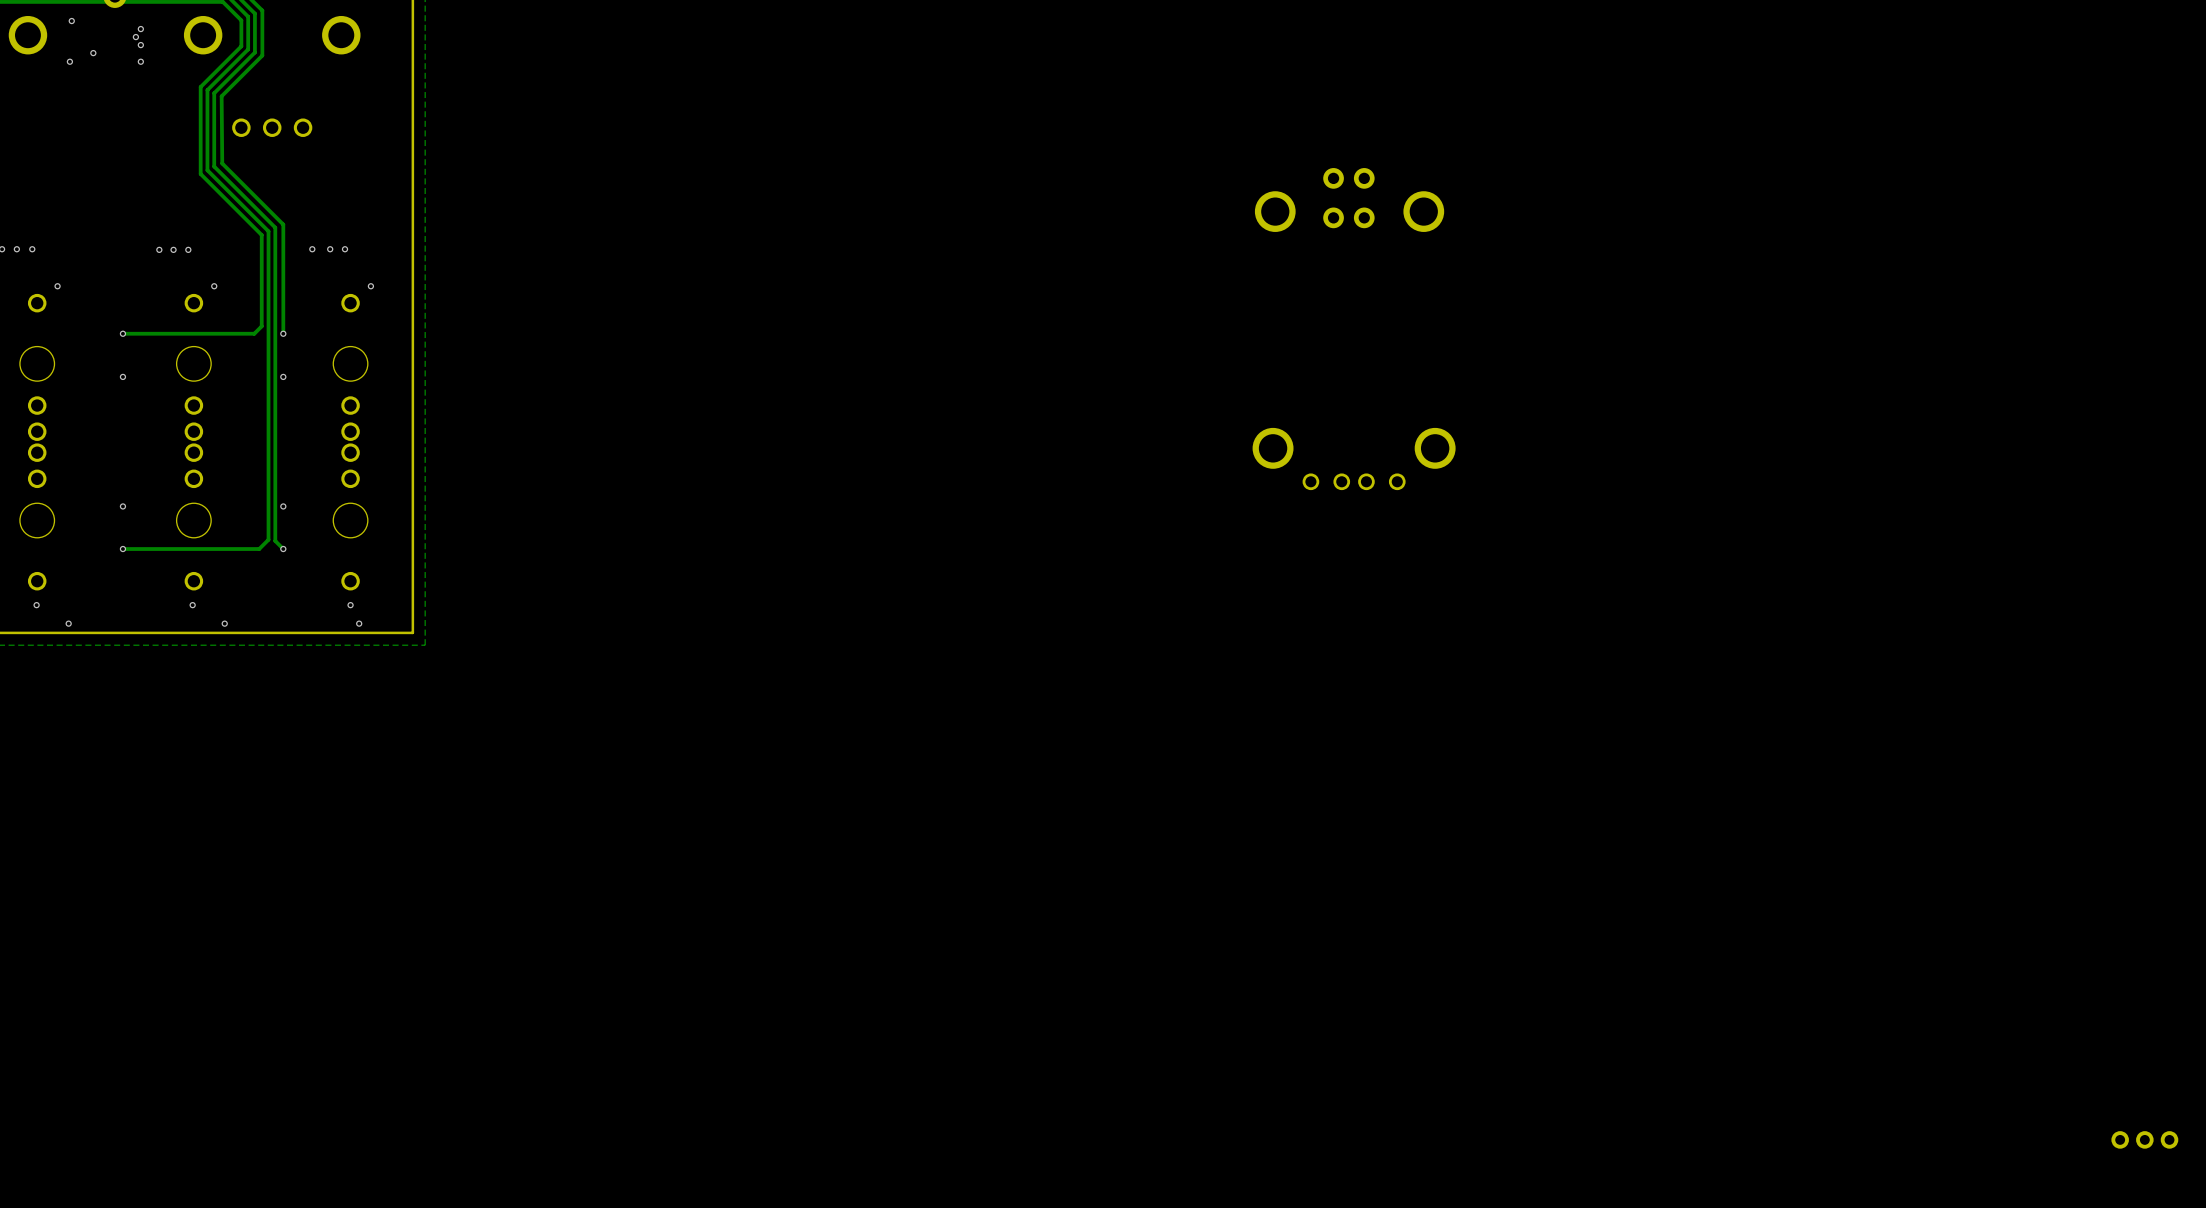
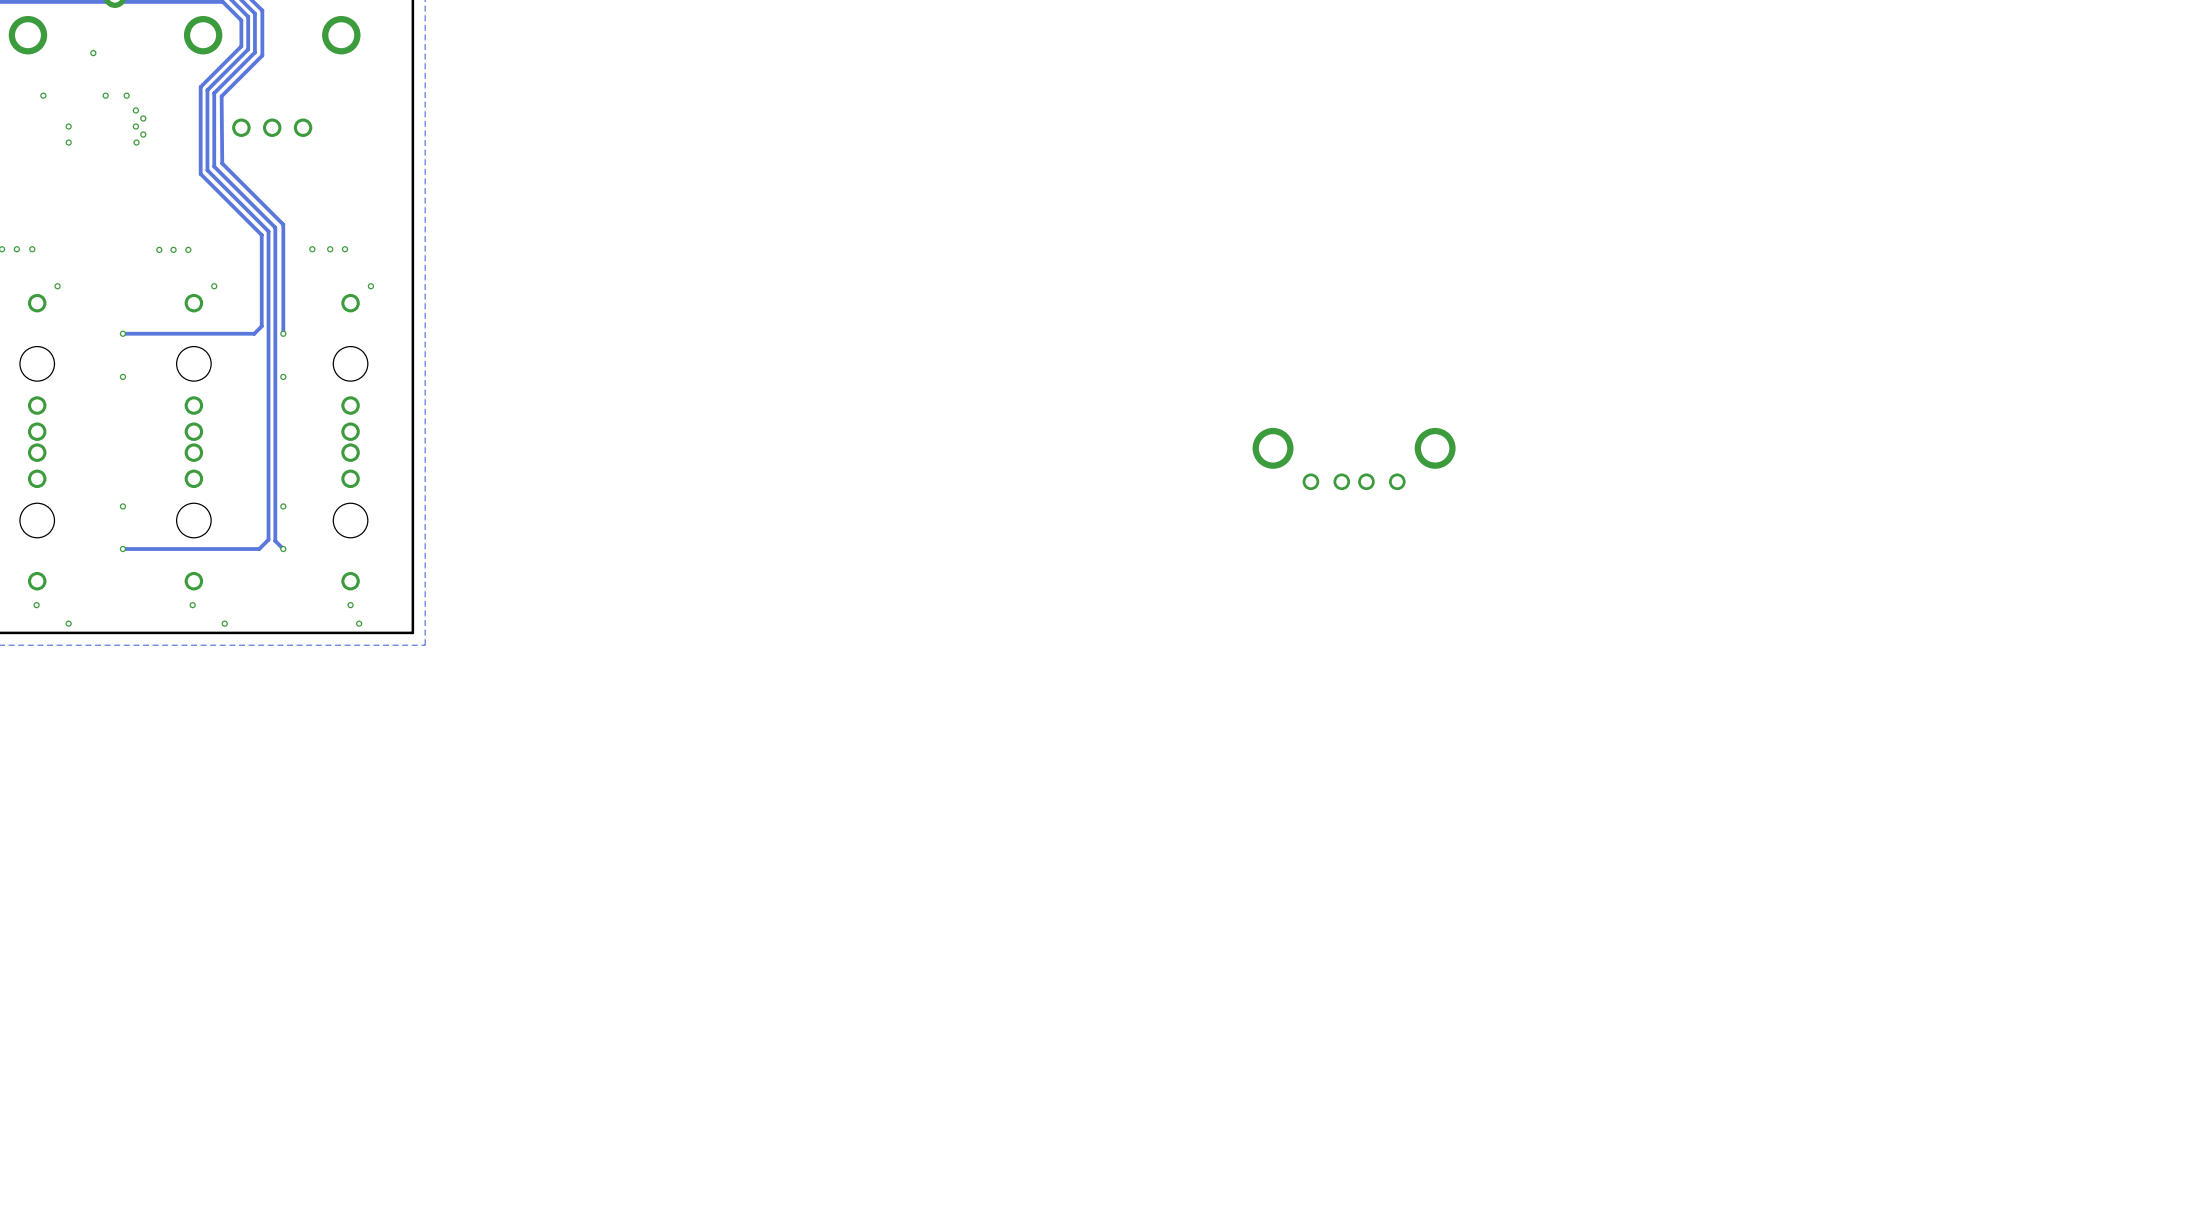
via: (71, 21) -> none
via: (140, 29) -> none
via: (135, 37) -> none
via: (140, 45) -> none
via: (69, 61) -> none
via: (140, 61) -> none
via: none -> (43, 95)
via: none -> (105, 95)
via: none -> (126, 95)
via: none -> (135, 110)
via: none -> (143, 118)
via: none -> (68, 126)
via: none -> (135, 126)
via: none -> (143, 134)
via: none -> (68, 142)
via: none -> (136, 142)
part: (1349, 200) -> none
part: (2144, 1139) -> none

